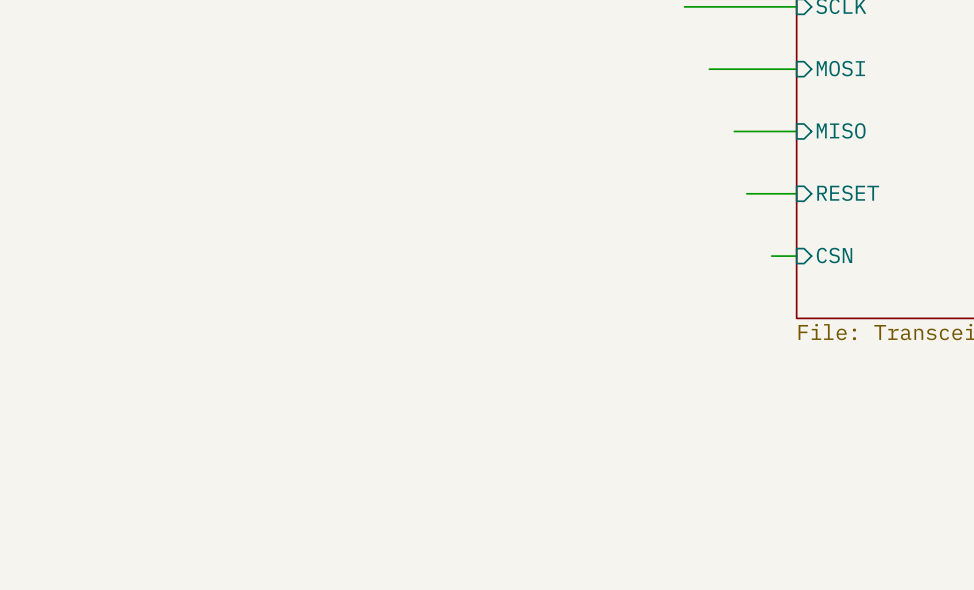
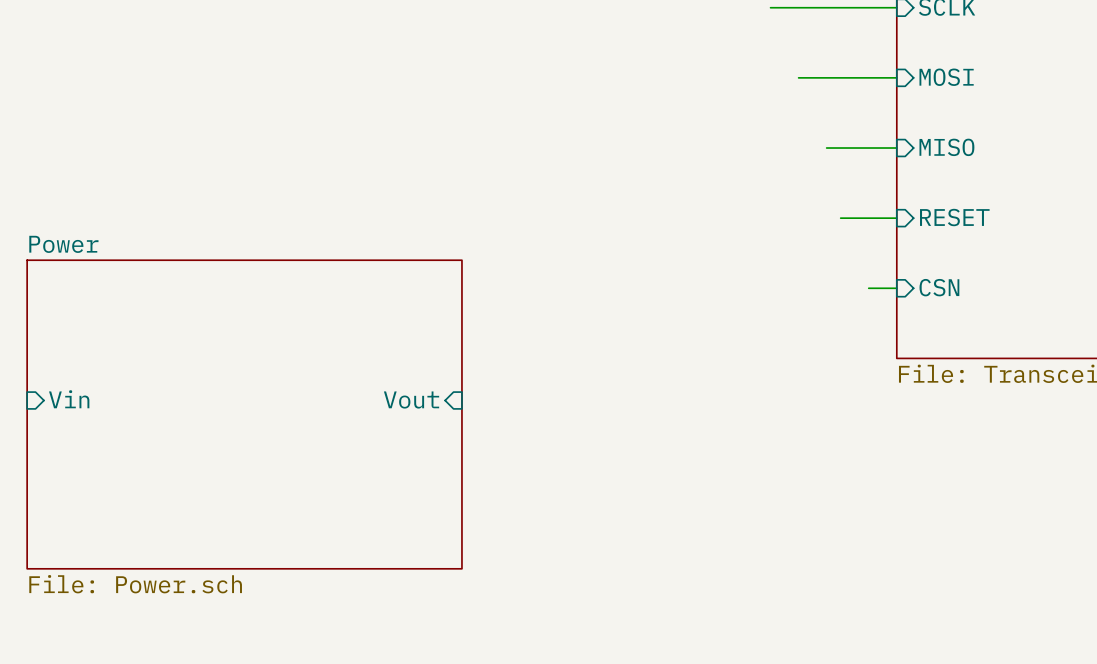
sheet pin: none -> Vin (69, 399)
sheet pin: none -> Vout (411, 400)
sheet Power: none -> File: Power.sch (244, 414)

